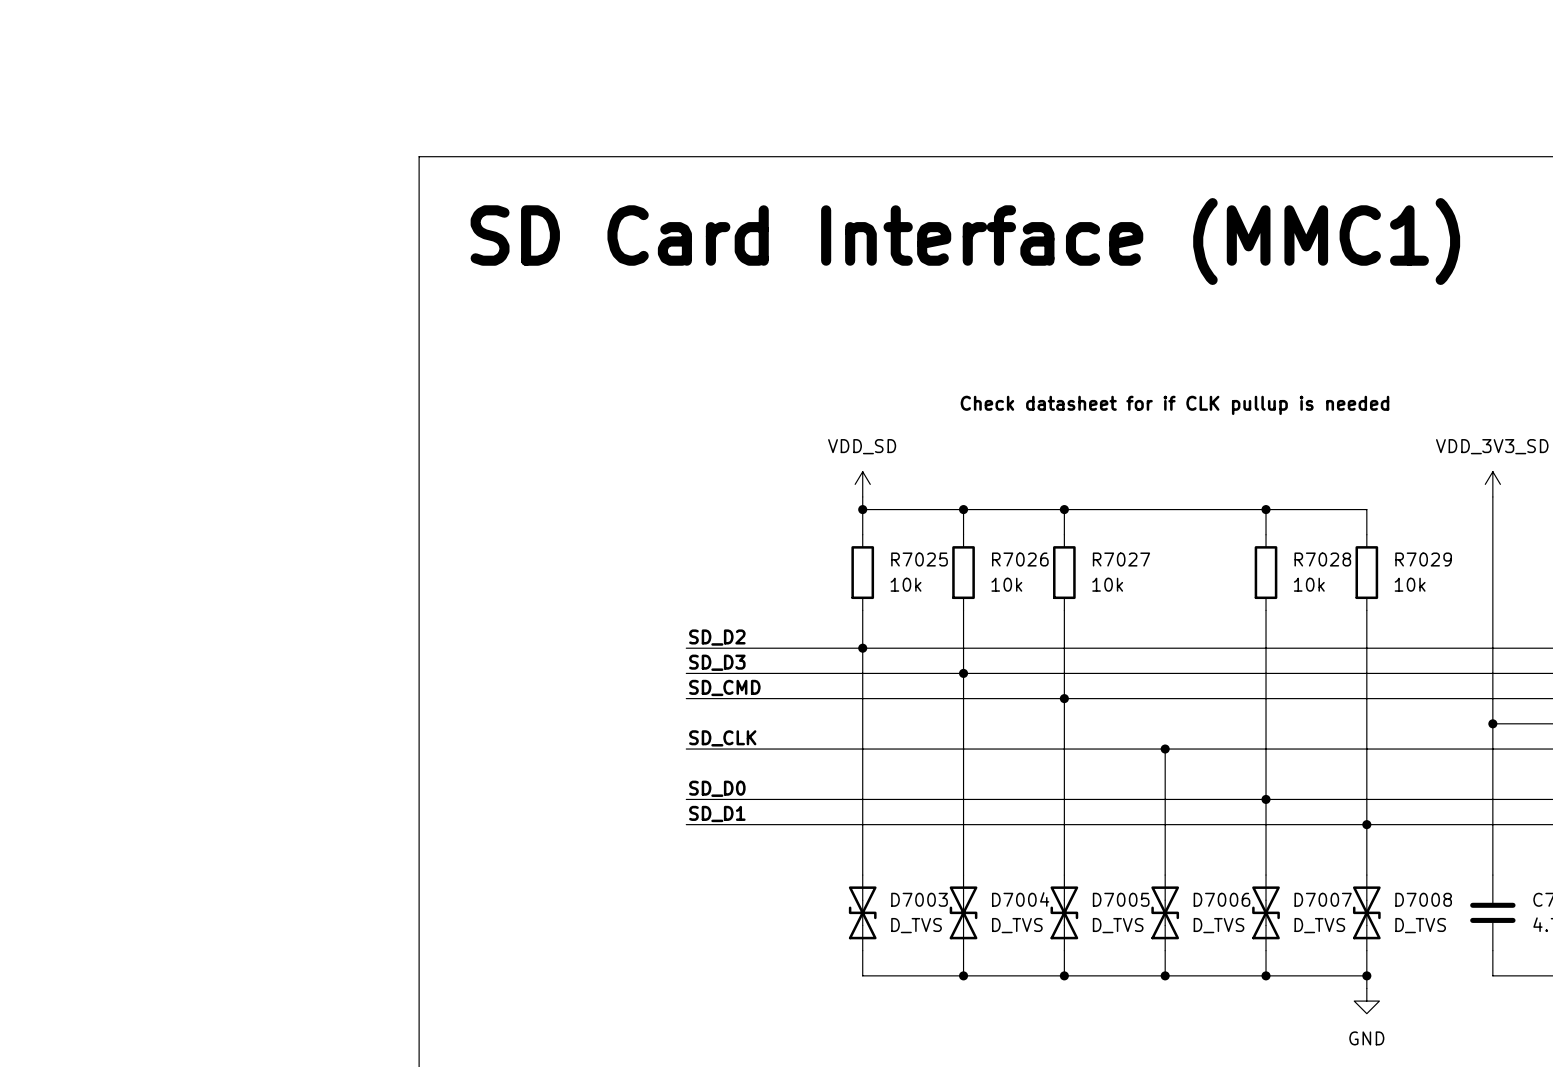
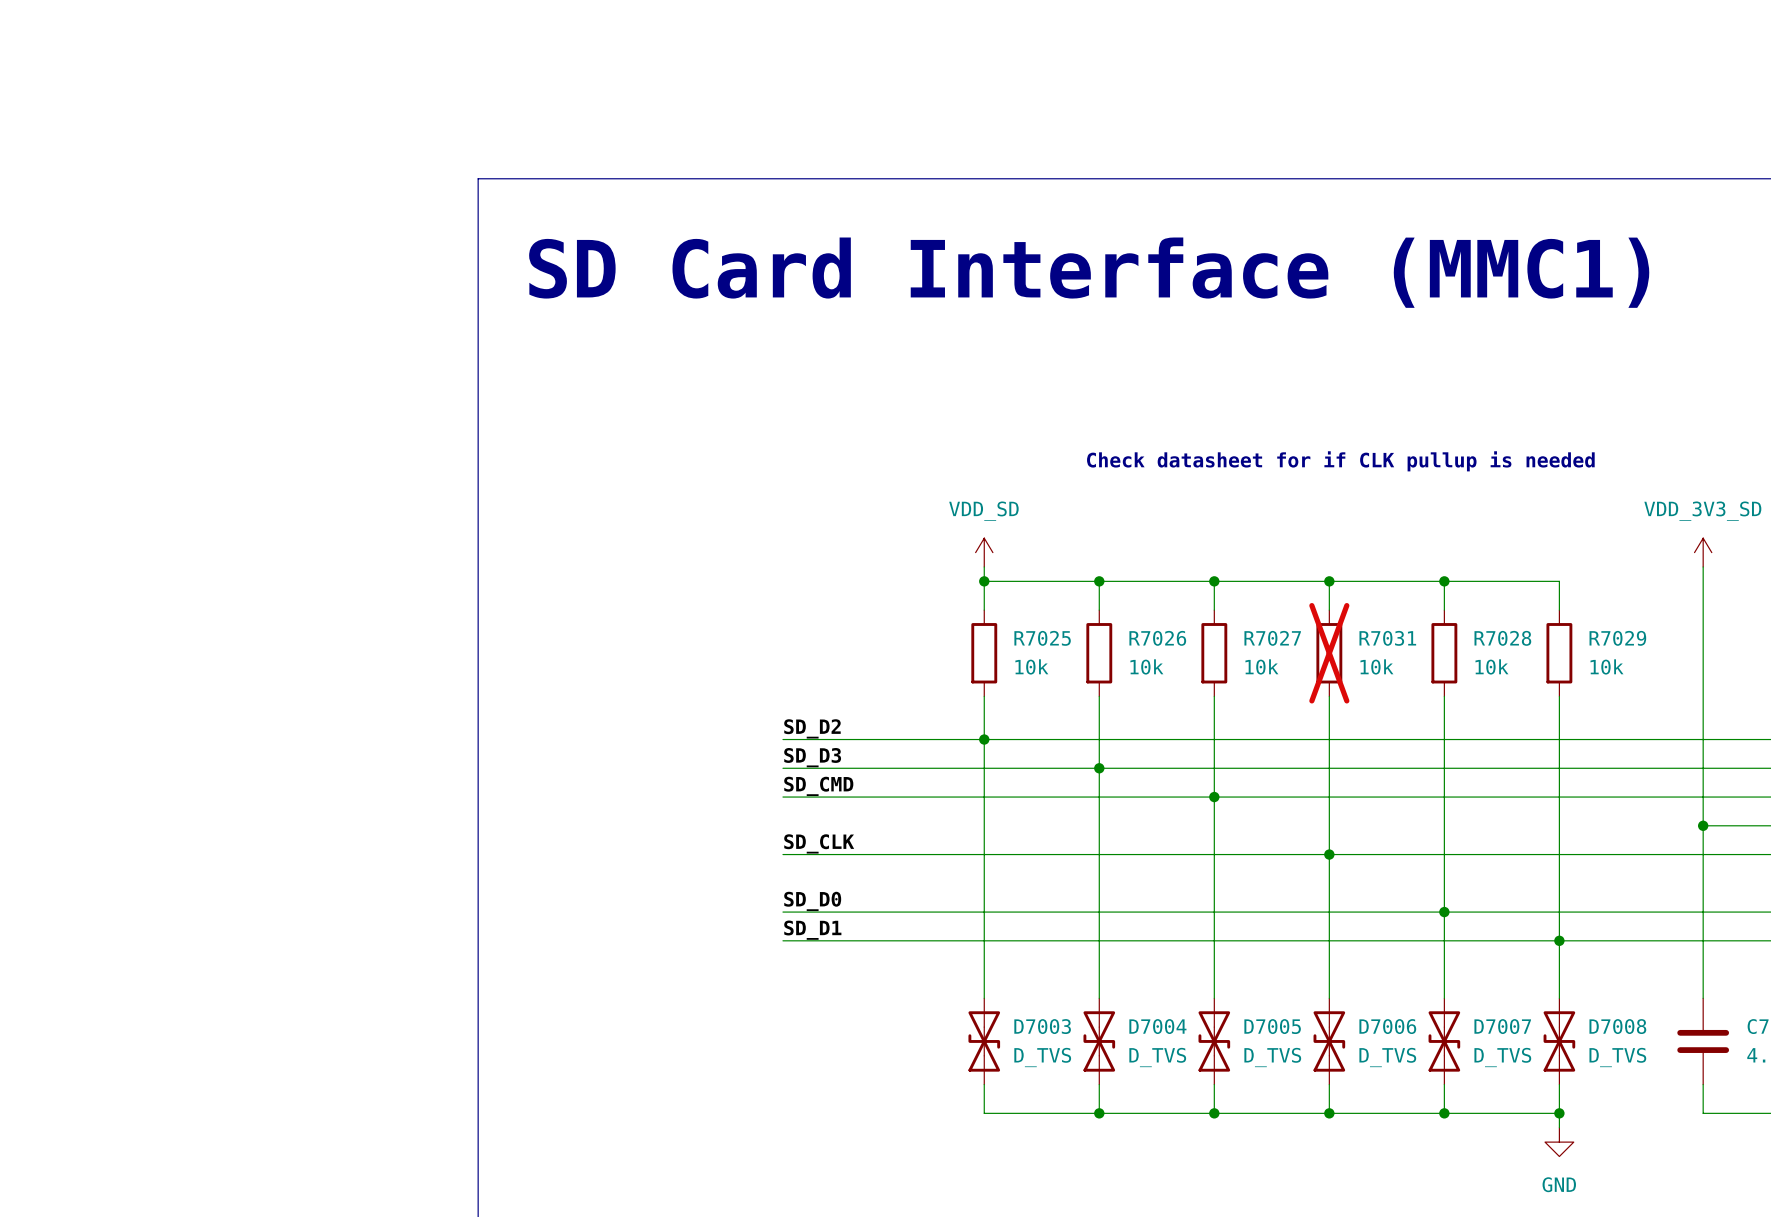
wire: none -> (1329, 581) (1329, 610)
junction: none -> (1329, 581)
R7031: none -> 10k (1329, 653)
wire: none -> (1329, 696) (1329, 854)

